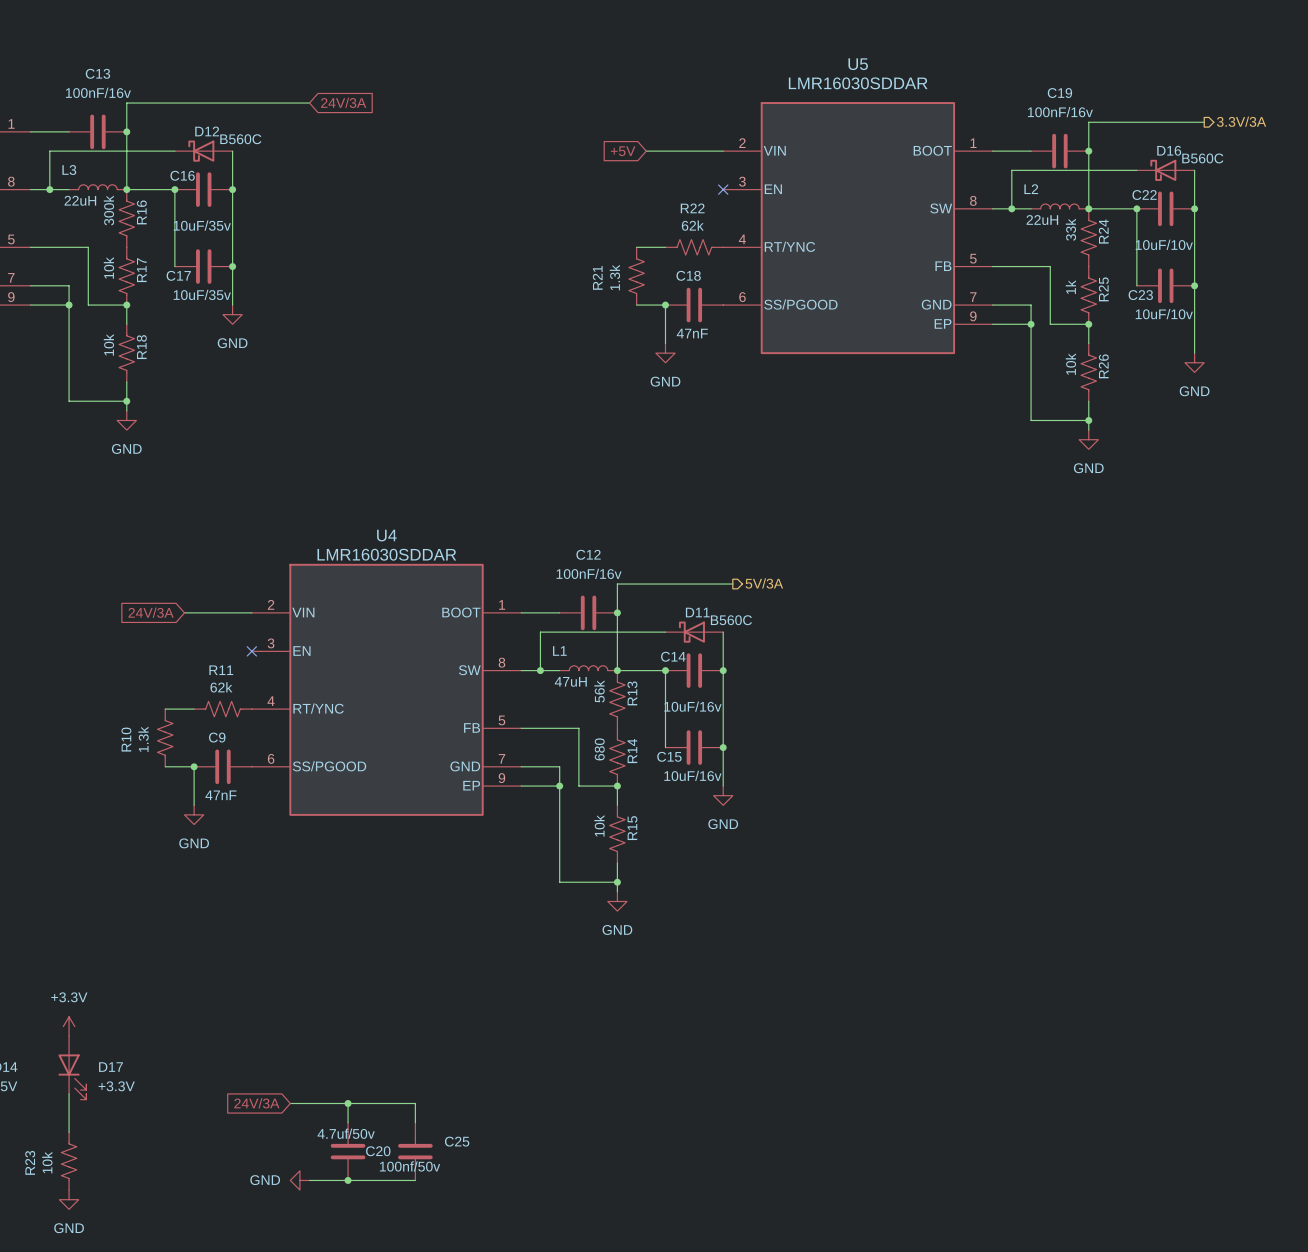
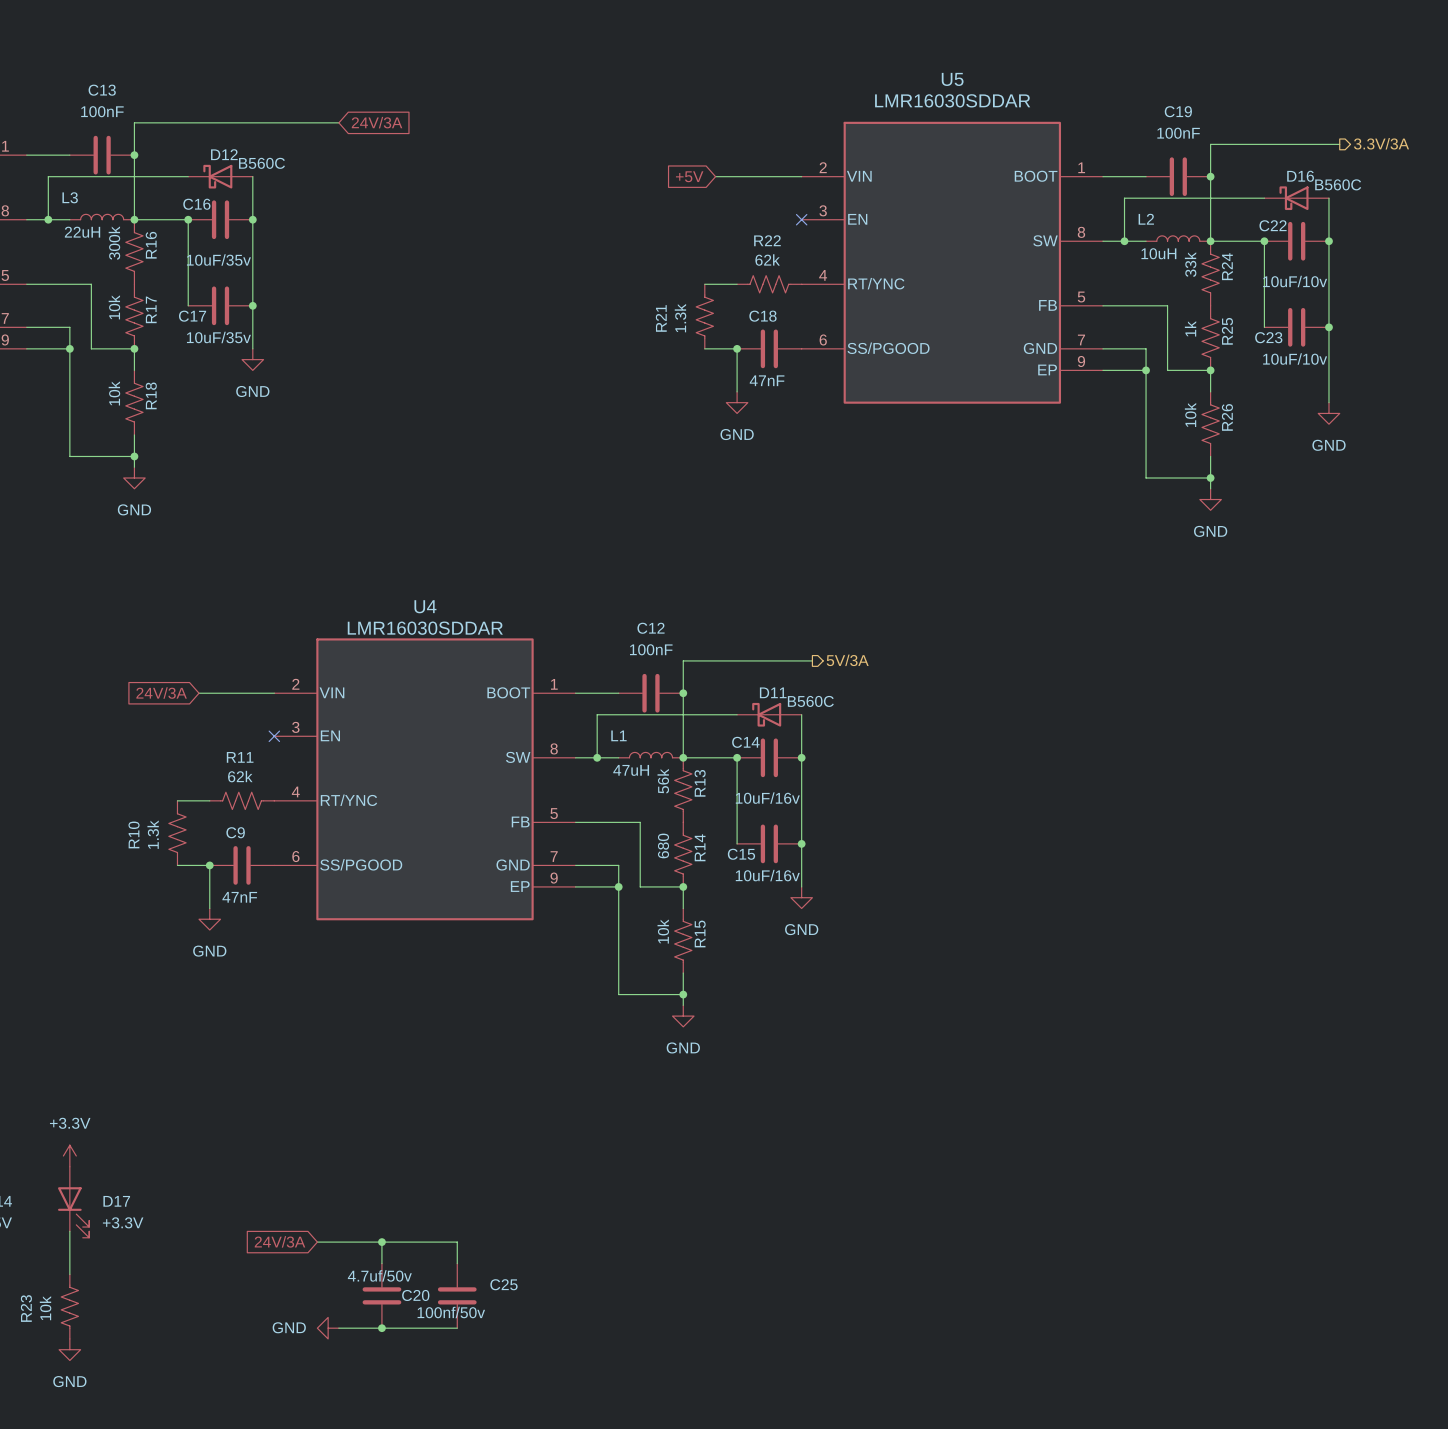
C13 value: 100nF/16v (98, 92) -> 100nF (102, 111)
C19 value: 100nF/16v (1060, 112) -> 100nF (1178, 133)
L2 value: 22uH (1042, 220) -> 10uH (1158, 253)
C12 value: 100nF/16v (589, 573) -> 100nF (651, 649)

